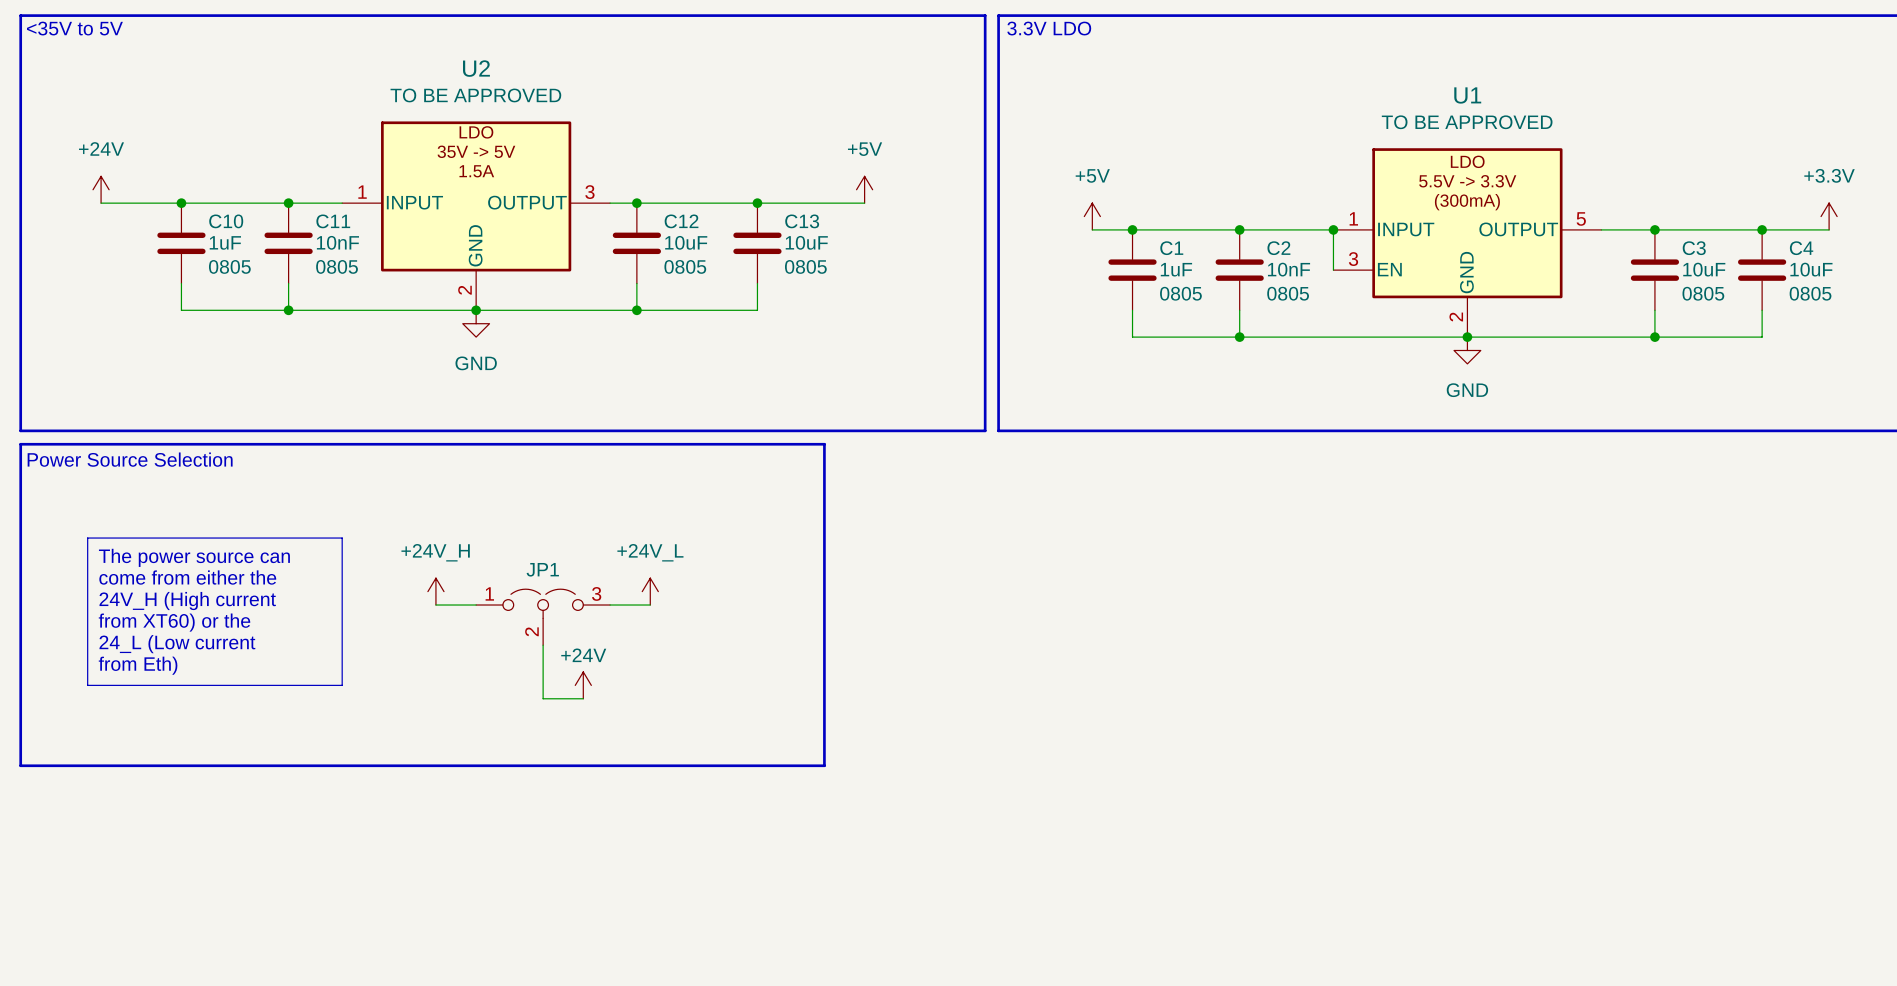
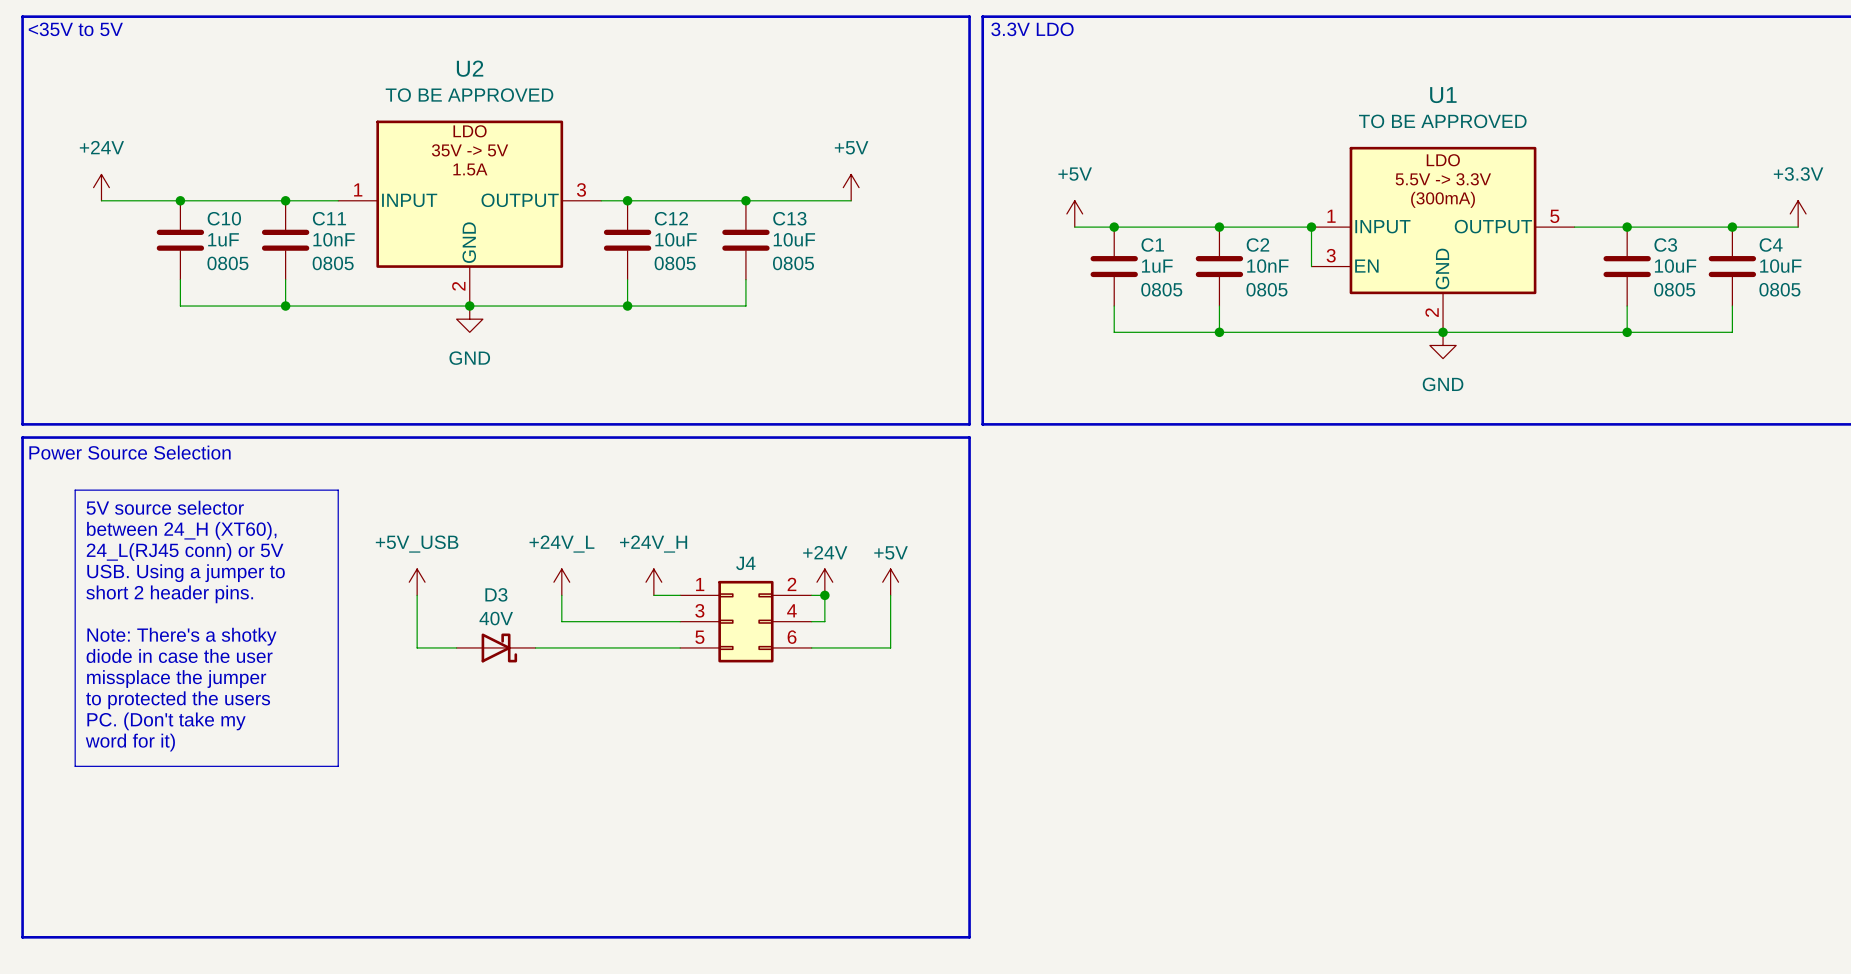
line: (824, 444) (824, 765) (20, 765) -> (811, 437) (969, 437) (969, 937) (22, 937) (22, 753)
text: none -> 5V source selector (165, 507)
line: (342, 538) (87, 538) (87, 685) (342, 685) -> (338, 529) (338, 490) (75, 490) (75, 766) (338, 766) (338, 674)
text: none -> between 24_H (XT60), (181, 530)
text: The power source can (194, 557) -> none
text: none -> 24_L(RJ45 conn) or 5V (185, 551)
text: come from either the (187, 577) -> none
text: none -> USB. Using a jumper to (186, 573)
power symbol: none -> +5V_USB (417, 582)
power symbol position: +24V_H (435, 591) -> +24V_H (653, 582)
power symbol position: +24V_L (650, 591) -> +24V_L (561, 582)
power symbol: none -> +24V (824, 582)
power symbol: none -> +5V (890, 582)
text: 24V_H (High current (187, 601) -> none
text: none -> short 2 header pins. (169, 594)
wire: (435, 605) (476, 605) -> none
wire: none -> (561, 595) (561, 621) (680, 621)
wire: (610, 605) (650, 605) -> none
wire: none -> (653, 595) (680, 595)
wire: none -> (811, 595) (824, 595) (824, 621) (811, 621)
junction: none -> (824, 595)
wire: none -> (890, 595) (890, 647) (811, 647)
JP1: (543, 617) -> none
text: from XT60) or the (174, 622) -> none
J4: none -> (745, 621)
text: 24_L (Low current (177, 644) -> none
wire: (543, 645) (543, 698) (583, 698) -> (417, 595) (417, 647) (456, 647)
text: none -> Note: There's a shotky (181, 636)
D3: none -> 40V (496, 647)
wire: none -> (535, 647) (680, 647)
text: from Eth) (138, 665) -> none
text: none -> diode in case the user (179, 655)
power symbol: +24V (583, 685) -> none
text: none -> missplace the jumper (176, 679)
text: none -> to protected the users (178, 700)
text: none -> PC. (Don't take my (166, 721)
text: none -> word for it) (130, 742)

